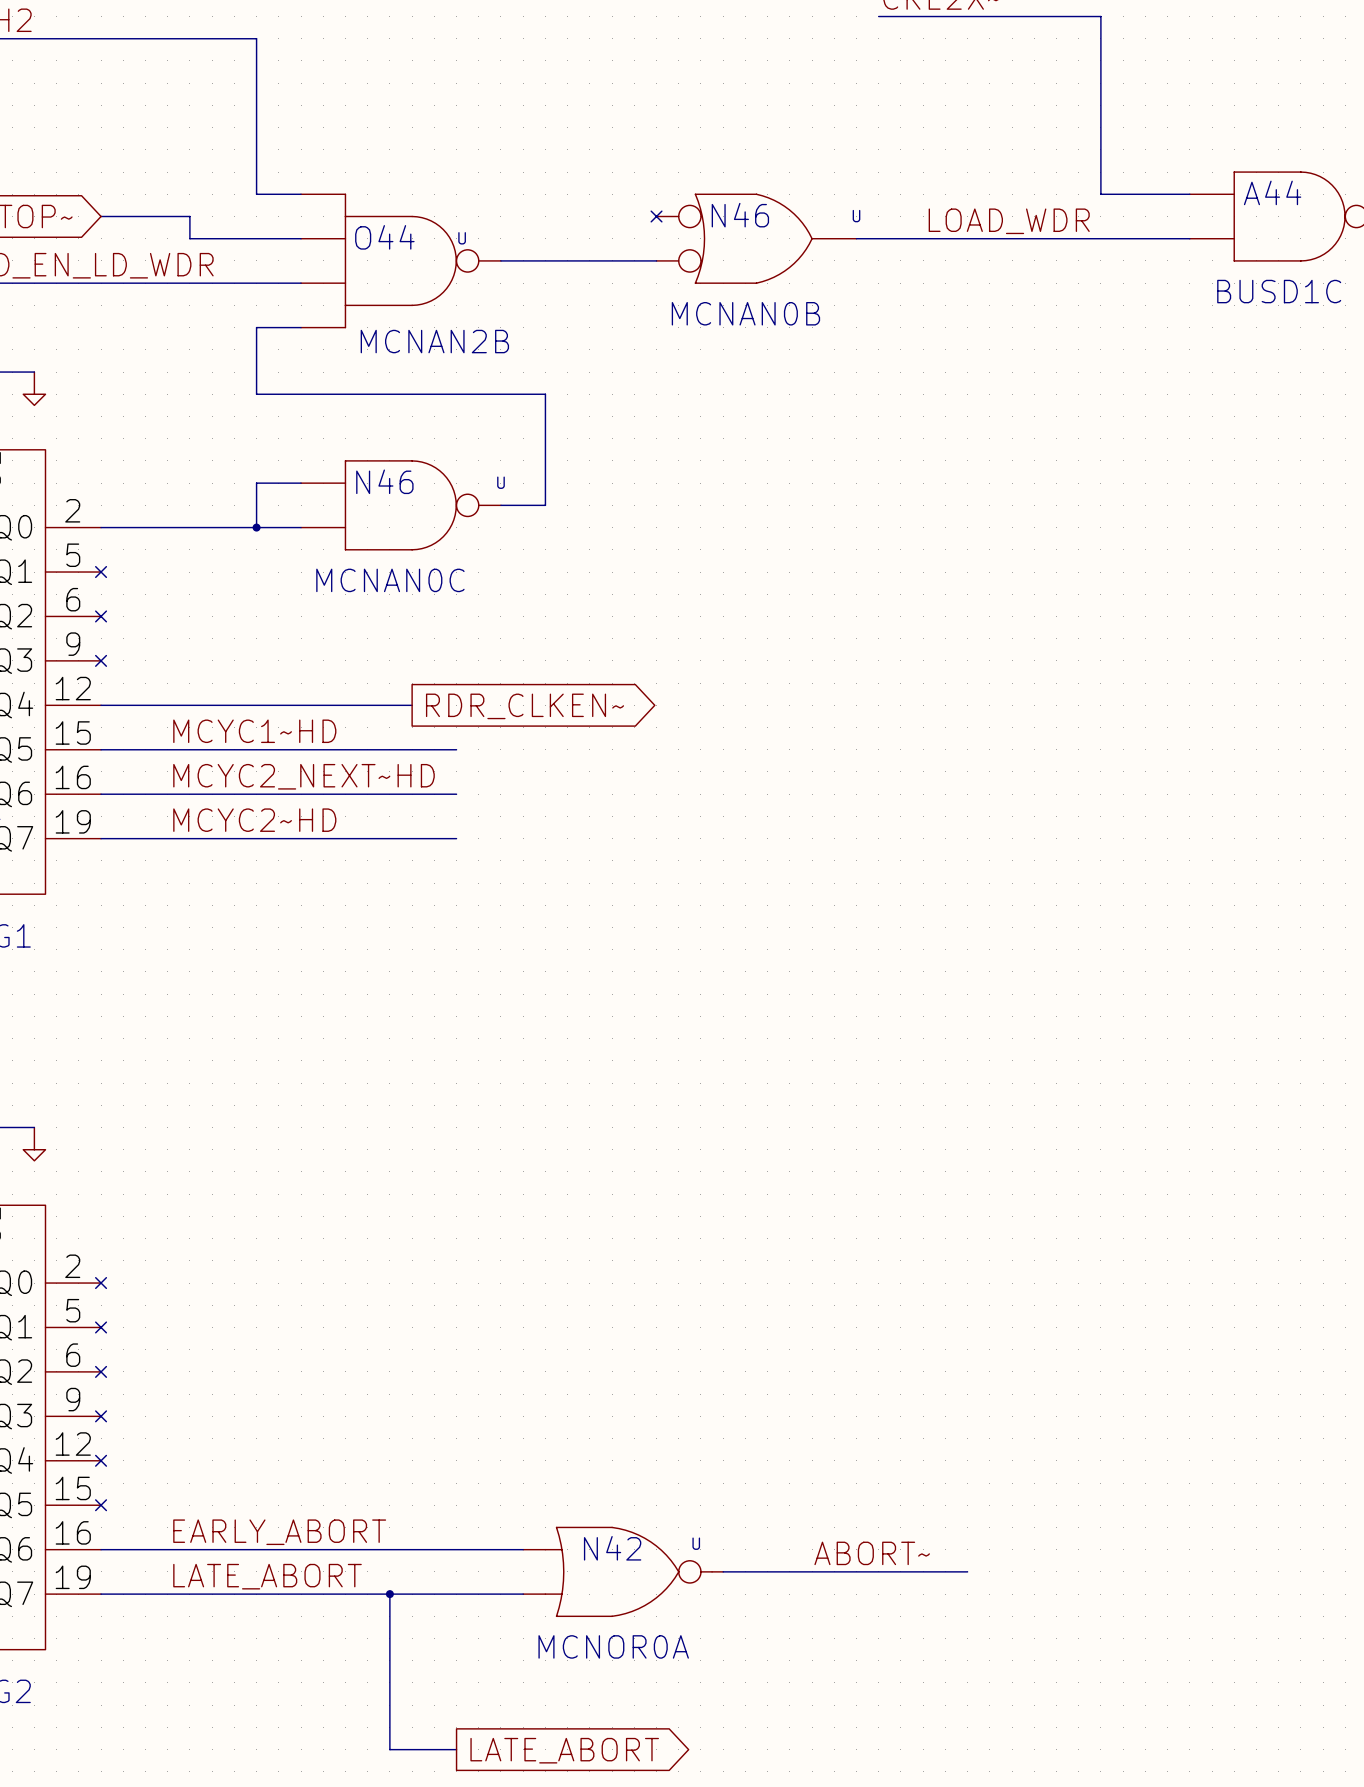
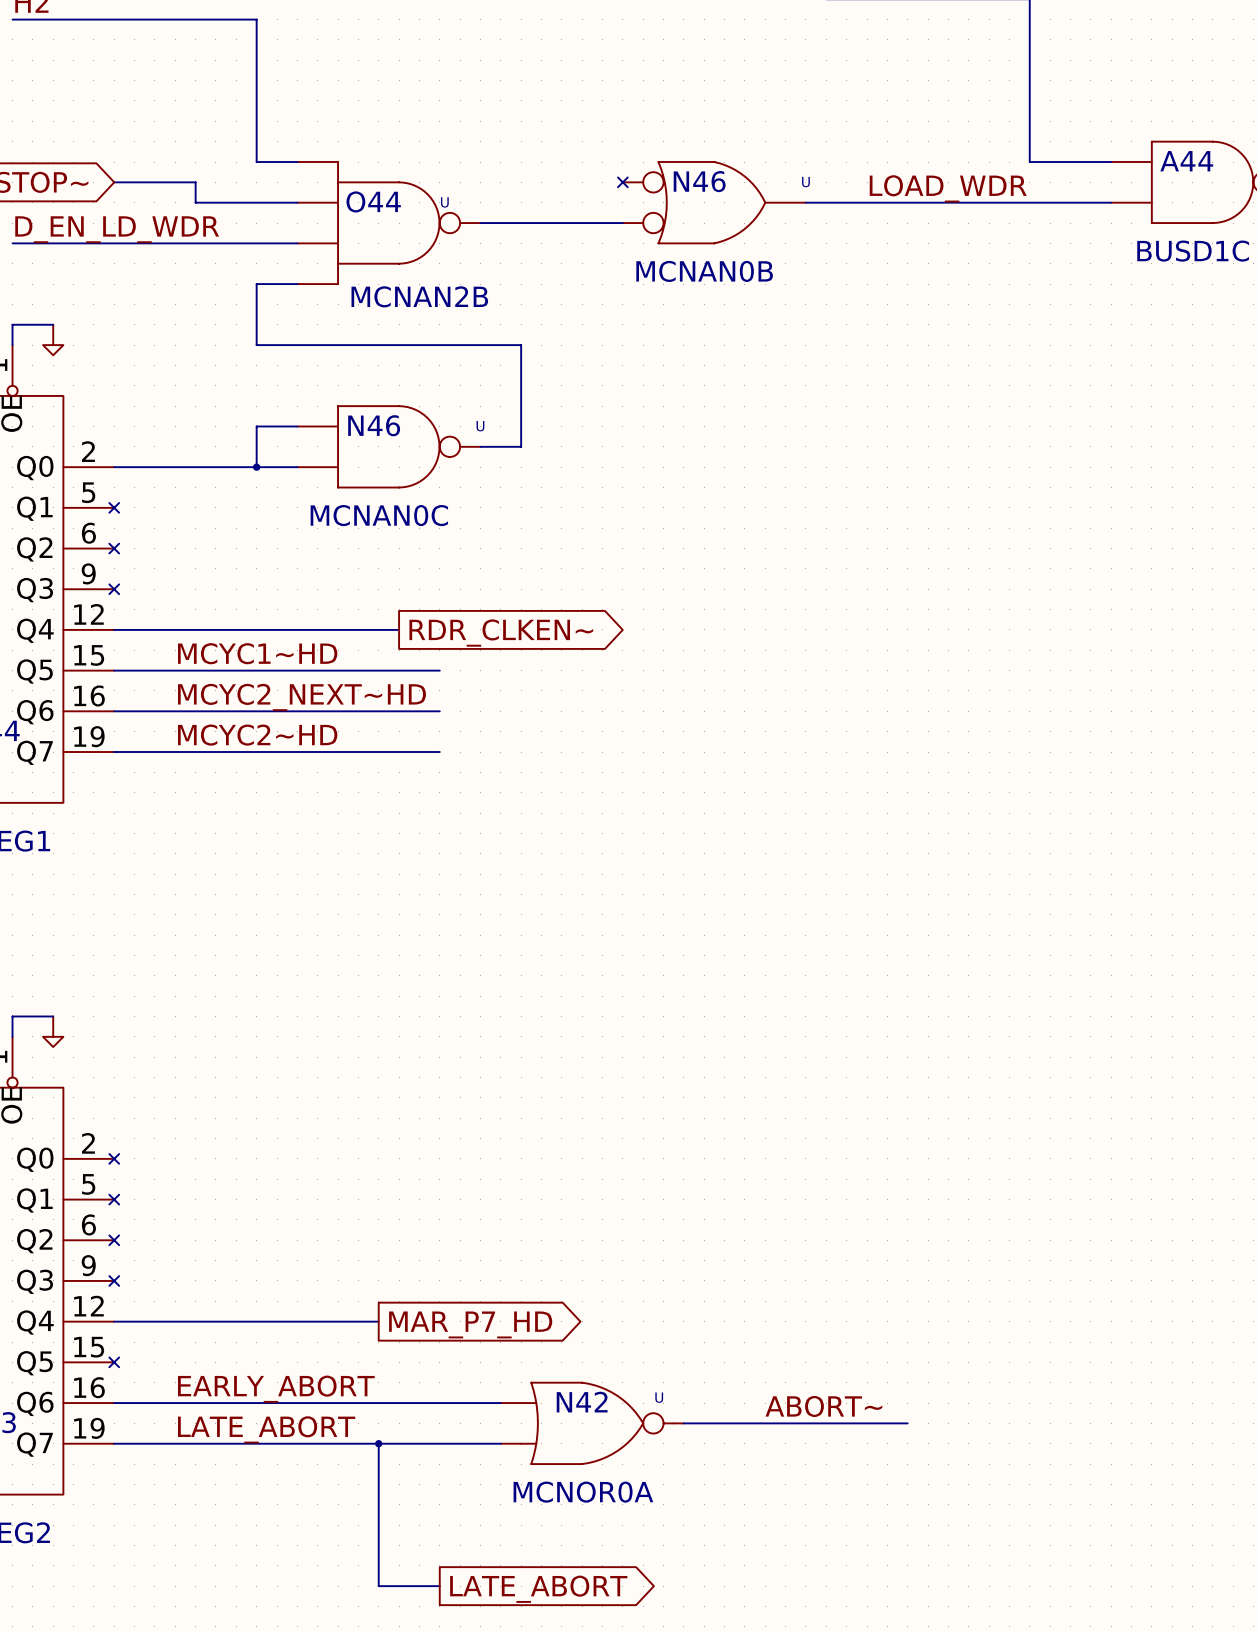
wire: none -> (114, 1321) (378, 1321)
no-connect mark: (101, 1460) -> none
global label: none -> MAR_P7_HD (470, 1324)

